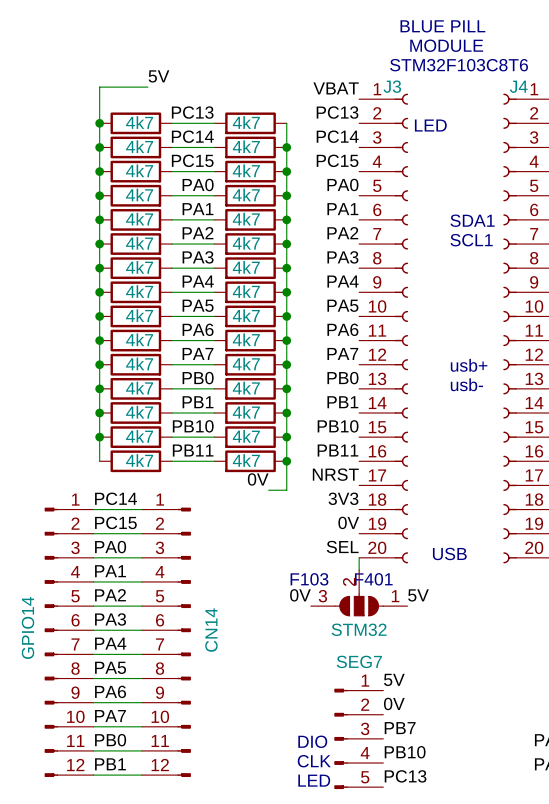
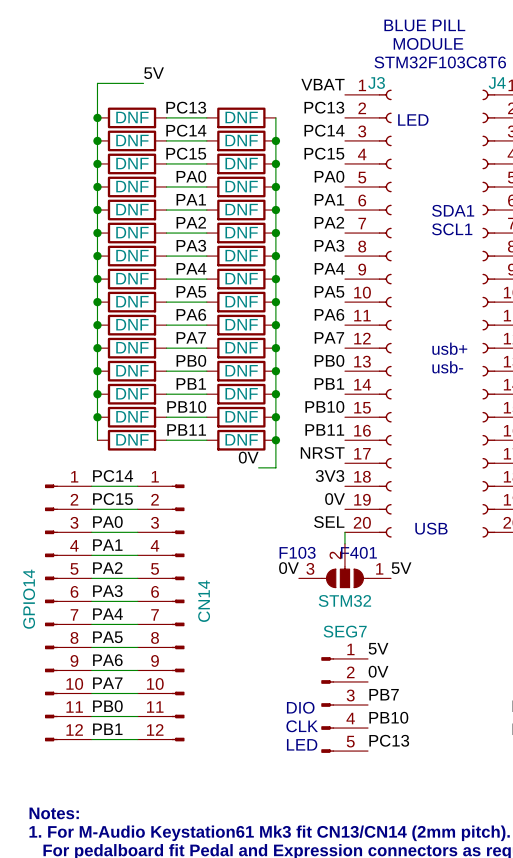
part value: 4k7 (139, 122) -> DNF (132, 117)
part value: 4k7 (246, 122) -> DNF (241, 117)
part value: 4k7 (139, 146) -> DNF (132, 140)
part value: 4k7 (246, 146) -> DNF (241, 140)
part value: 4k7 (139, 170) -> DNF (132, 163)
part value: 4k7 (246, 170) -> DNF (241, 163)
part value: 4k7 (139, 194) -> DNF (132, 186)
part value: 4k7 (246, 194) -> DNF (241, 186)
part value: 4k7 (139, 219) -> DNF (132, 209)
part value: 4k7 (246, 219) -> DNF (241, 209)
part value: 4k7 (139, 243) -> DNF (132, 232)
part value: 4k7 (246, 243) -> DNF (241, 232)
part value: 4k7 (139, 267) -> DNF (132, 255)
part value: 4k7 (246, 267) -> DNF (241, 255)
part value: 4k7 (139, 291) -> DNF (132, 278)
part value: 4k7 (246, 291) -> DNF (241, 278)
part value: 4k7 (139, 315) -> DNF (132, 301)
part value: 4k7 (246, 315) -> DNF (241, 301)
part value: 4k7 (139, 339) -> DNF (132, 324)
part value: 4k7 (246, 339) -> DNF (241, 324)
part value: 4k7 (139, 363) -> DNF (132, 347)
part value: 4k7 (246, 363) -> DNF (241, 347)
part value: 4k7 (139, 388) -> DNF (132, 370)
part value: 4k7 (246, 388) -> DNF (241, 370)
part value: 4k7 (139, 412) -> DNF (132, 393)
part value: 4k7 (246, 412) -> DNF (241, 393)
part value: 4k7 (139, 436) -> DNF (132, 416)
part value: 4k7 (246, 436) -> DNF (241, 416)
part value: 4k7 (139, 460) -> DNF (132, 439)
part value: 4k7 (246, 460) -> DNF (241, 439)

